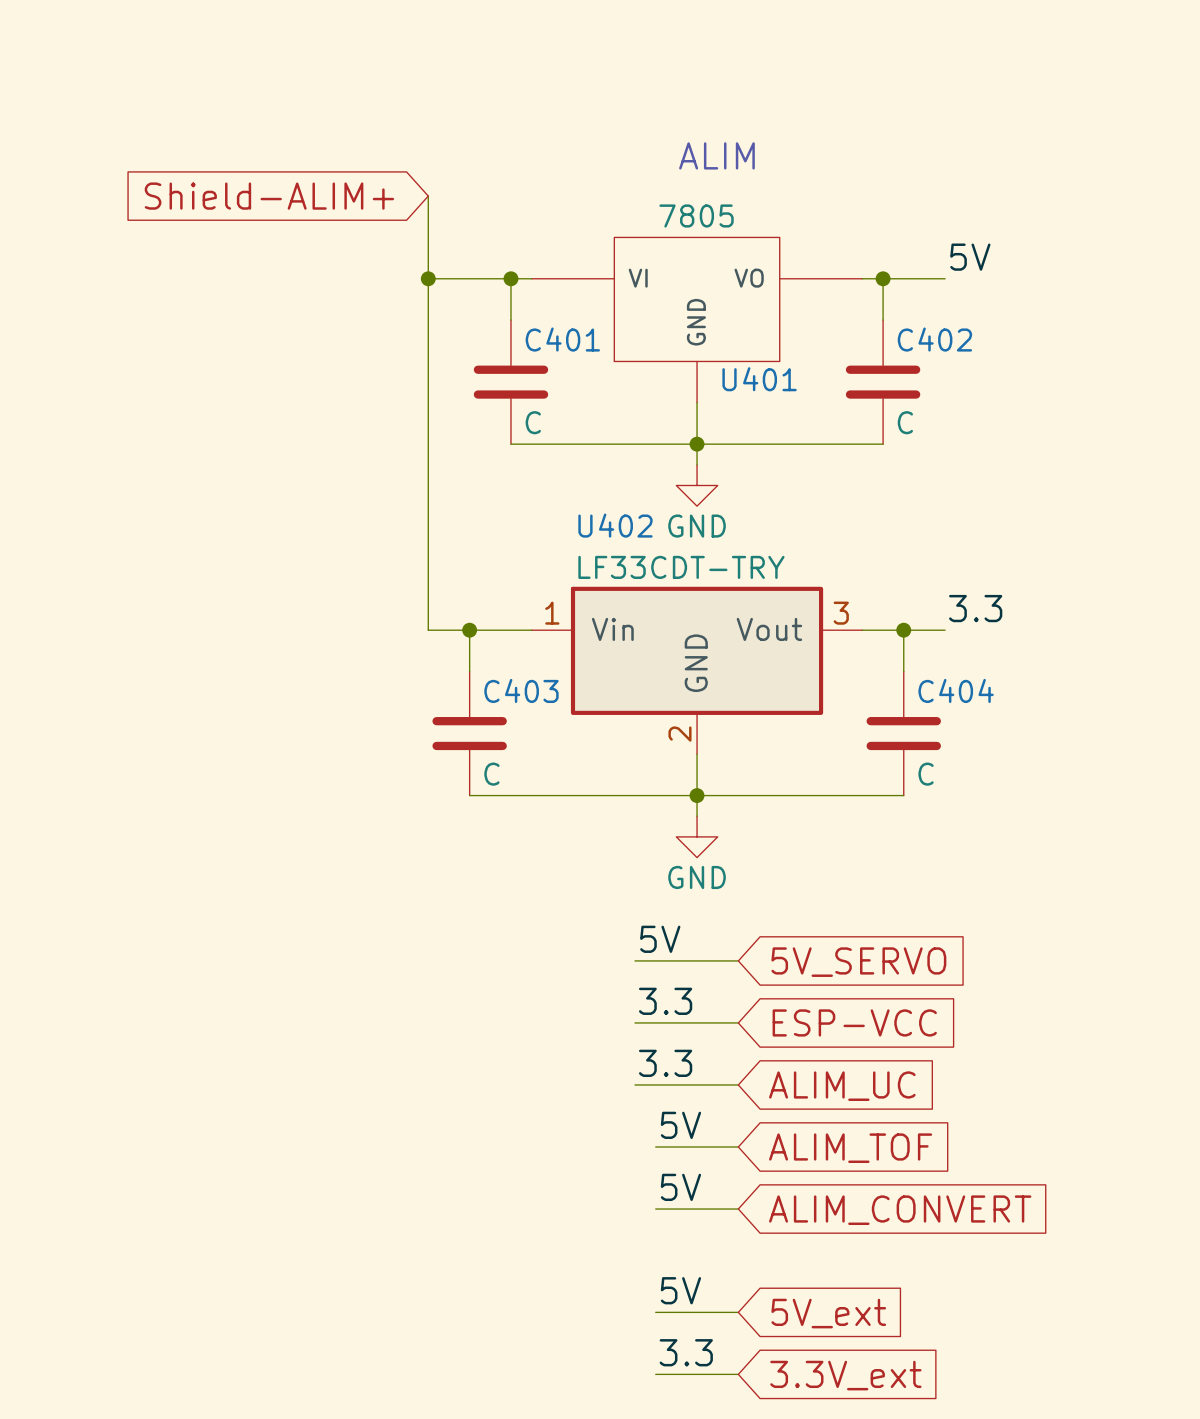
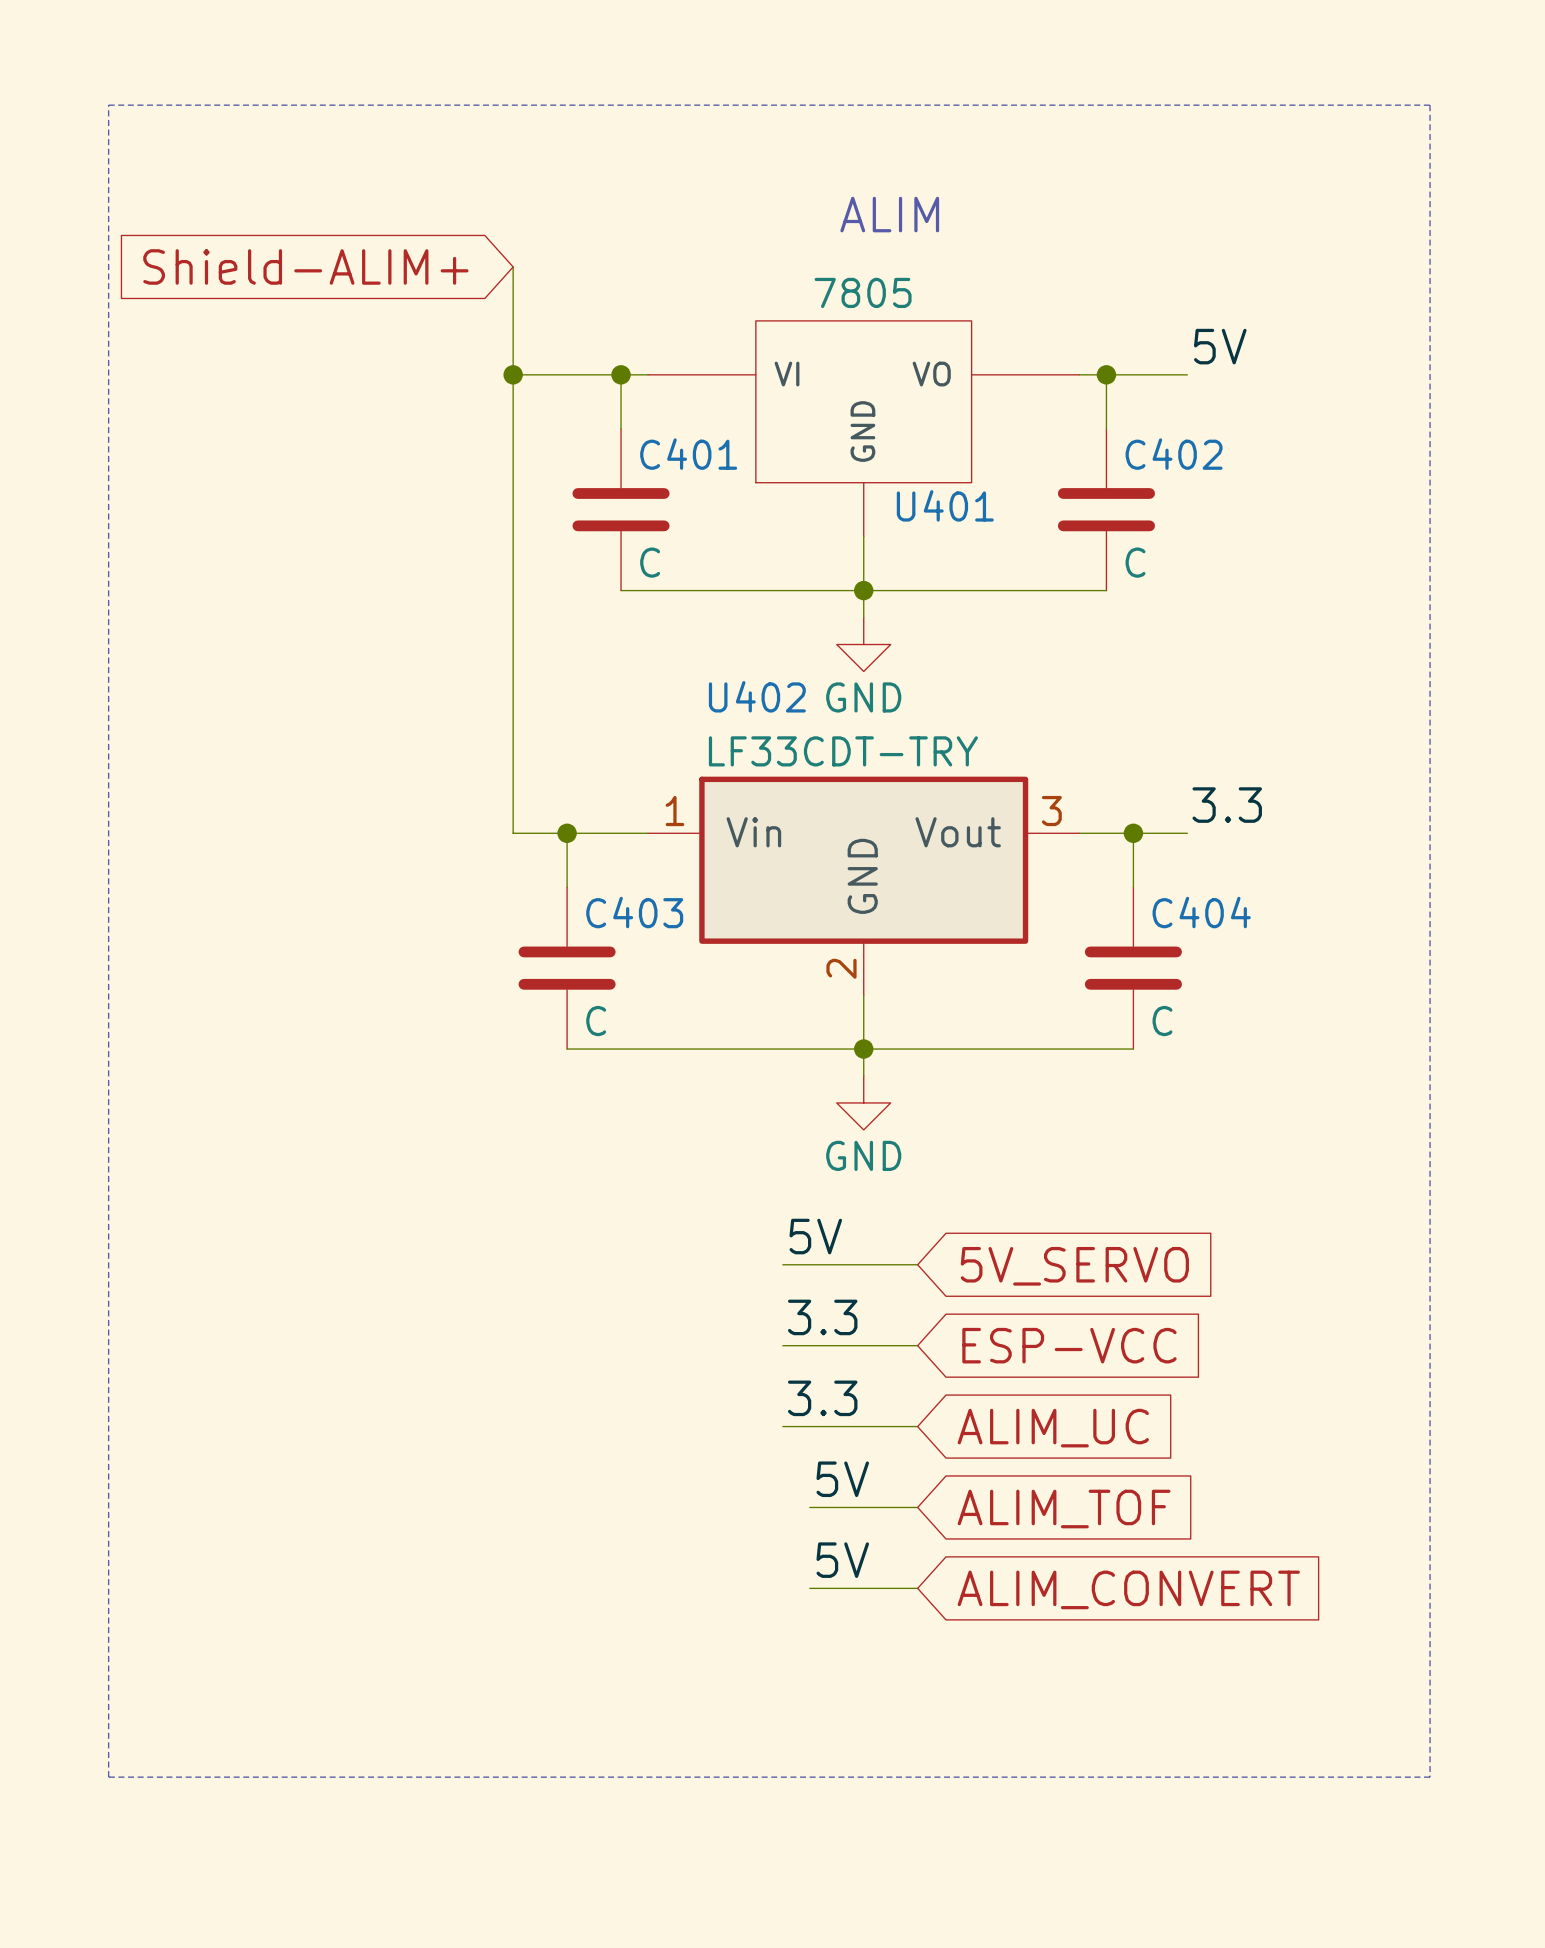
line: none -> (108, 105) (1430, 105) (1430, 1777) (108, 1777) (108, 105)
label: 5V (680, 1290) -> none
wire: (655, 1312) (738, 1312) -> none
global label: 5V_ext (828, 1313) -> none
label: 3.3 (686, 1352) -> none
wire: (655, 1374) (738, 1374) -> none
global label: 3.3V_ext (845, 1375) -> none

